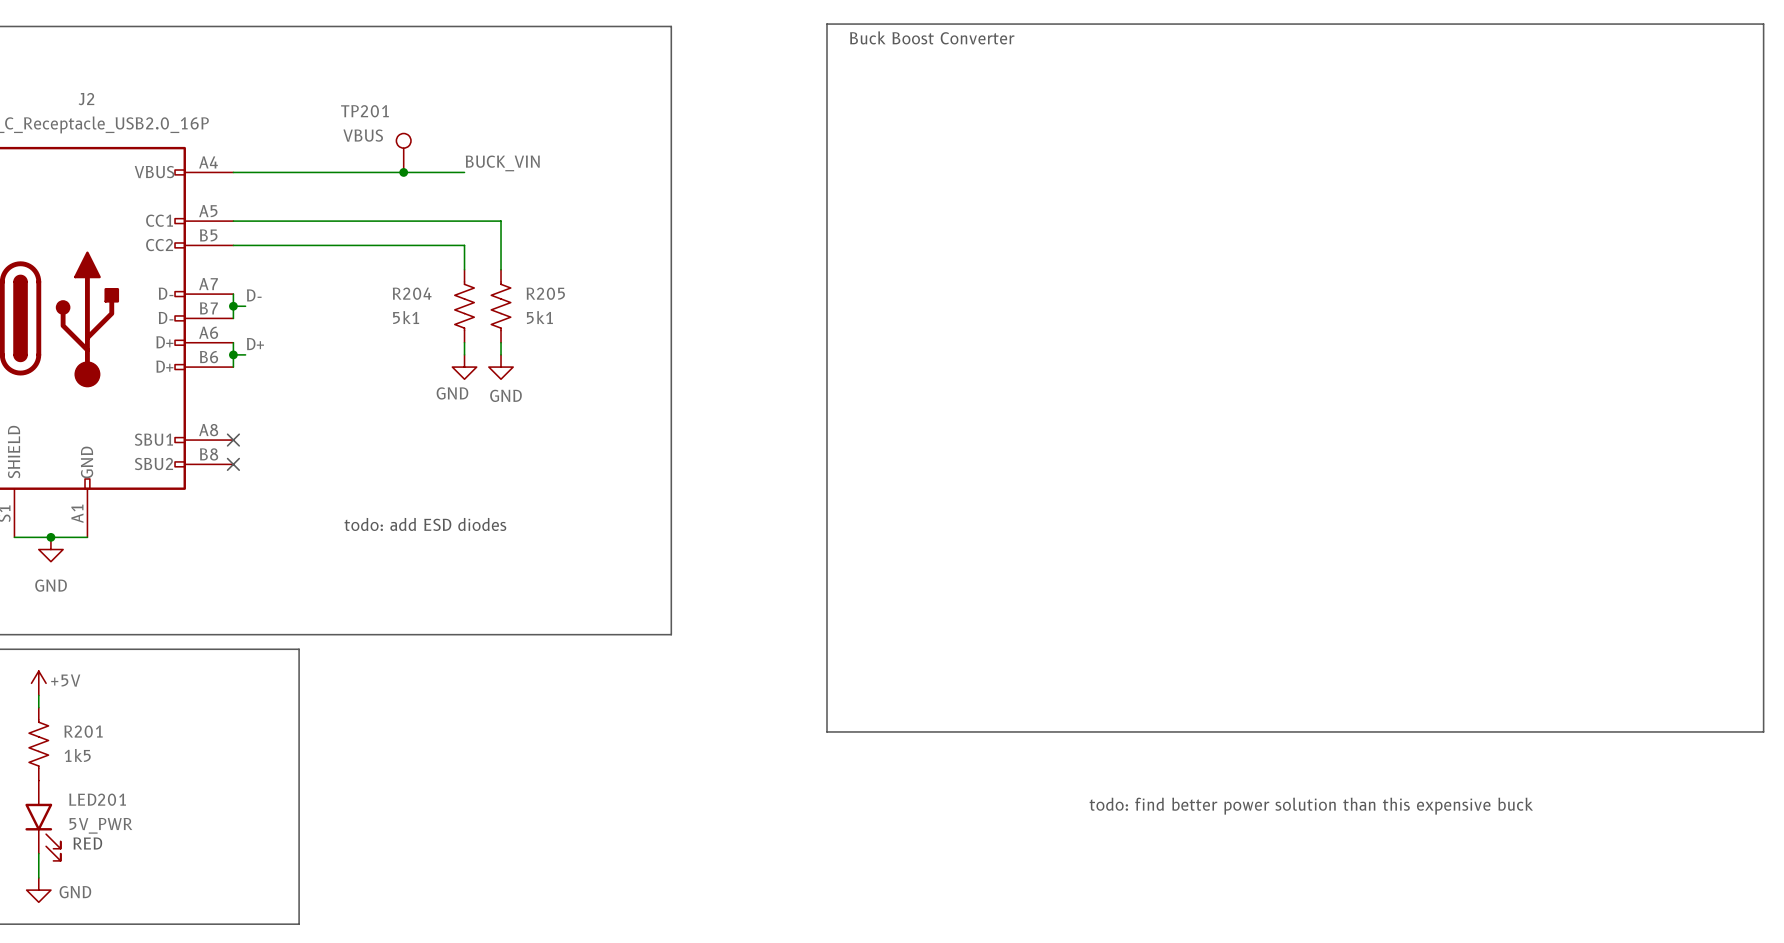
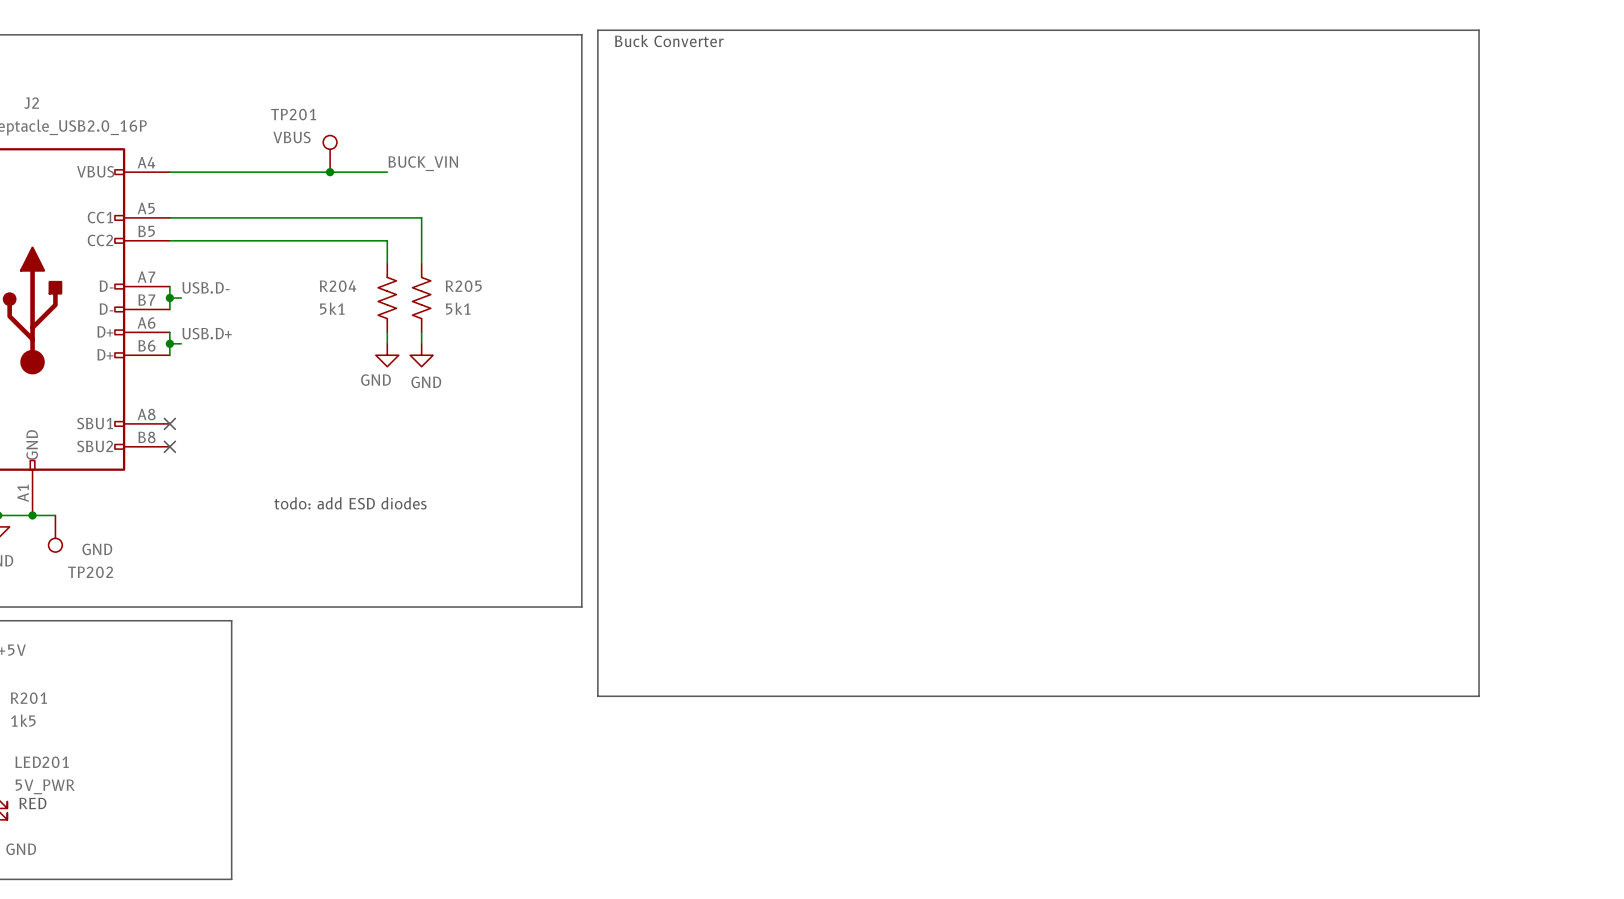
line: (827, 24) (1763, 24) (1763, 731) (827, 731) (827, 24) -> (597, 30) (597, 696) (1479, 696) (1479, 30) (597, 30)
text: Buck Boost Converter (932, 37) -> Buck Converter (669, 41)
label: D- (254, 295) -> USB.D- (205, 287)
label: D+ (255, 344) -> USB.D+ (207, 333)
wire: none -> (32, 515) (55, 515)
junction: none -> (32, 515)
TP202: none -> GND (55, 533)
text: todo: find better power solution than this expensive buck (1311, 806) -> none

